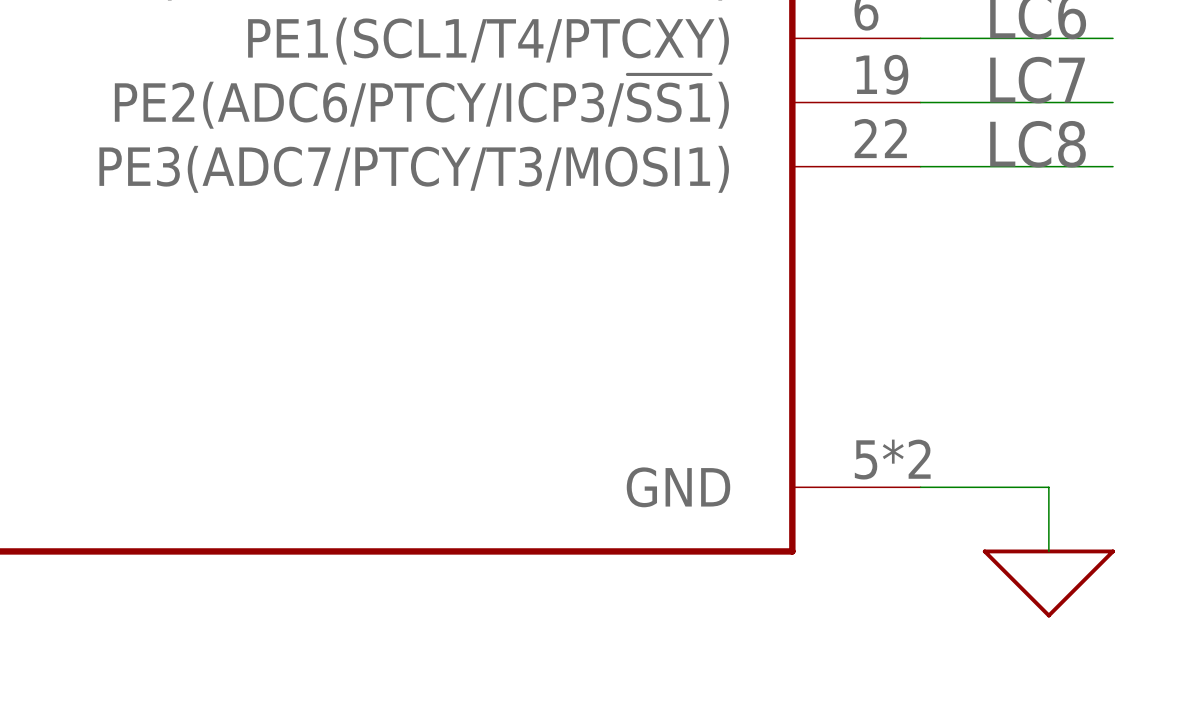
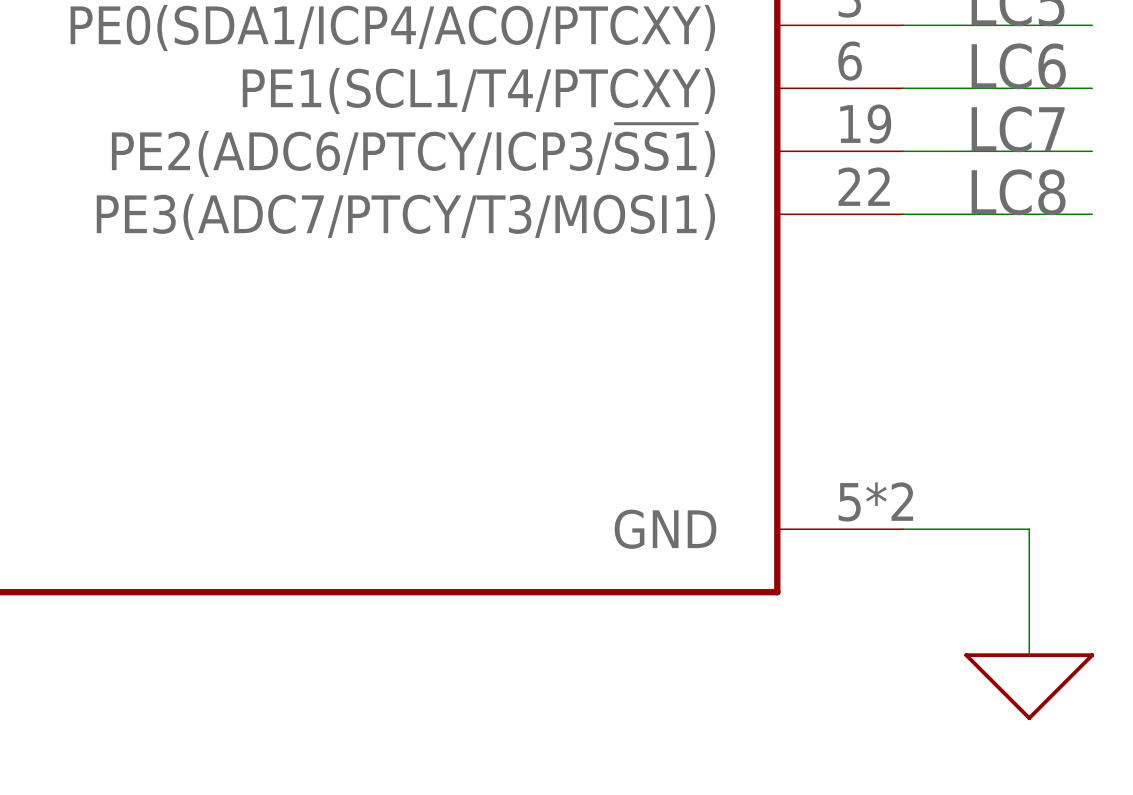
wire: none -> (1029, 592) (1029, 655)
power symbol position: (1048, 583) -> (1029, 686)

